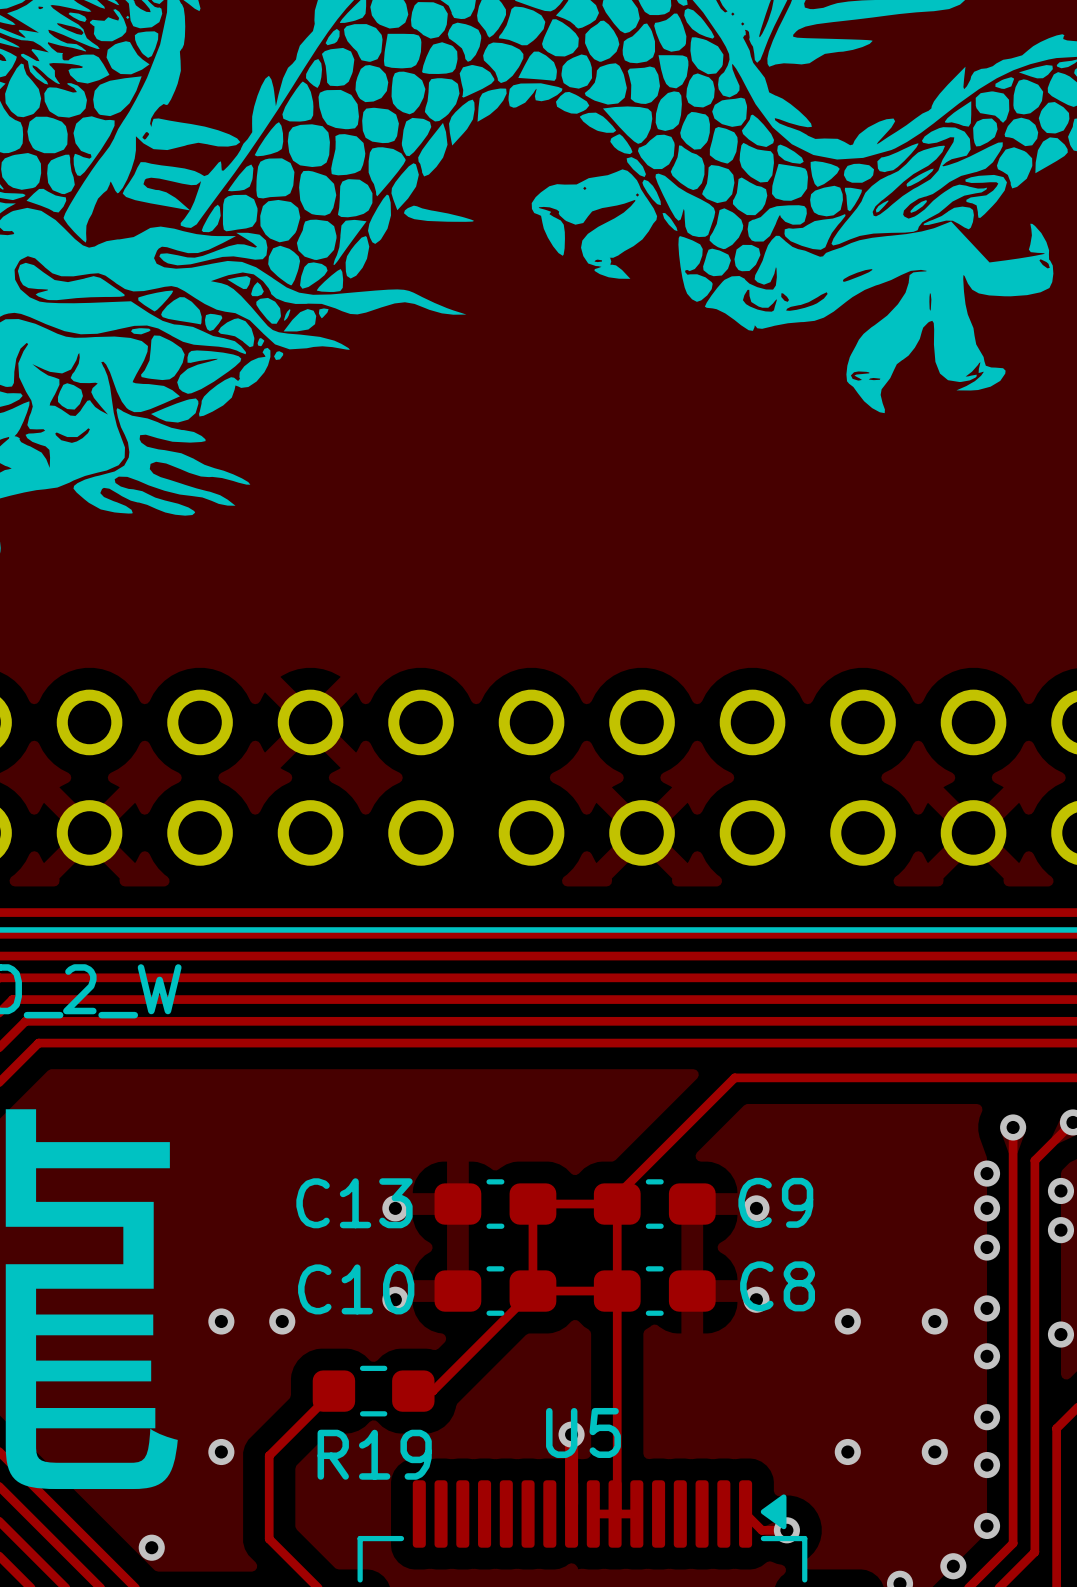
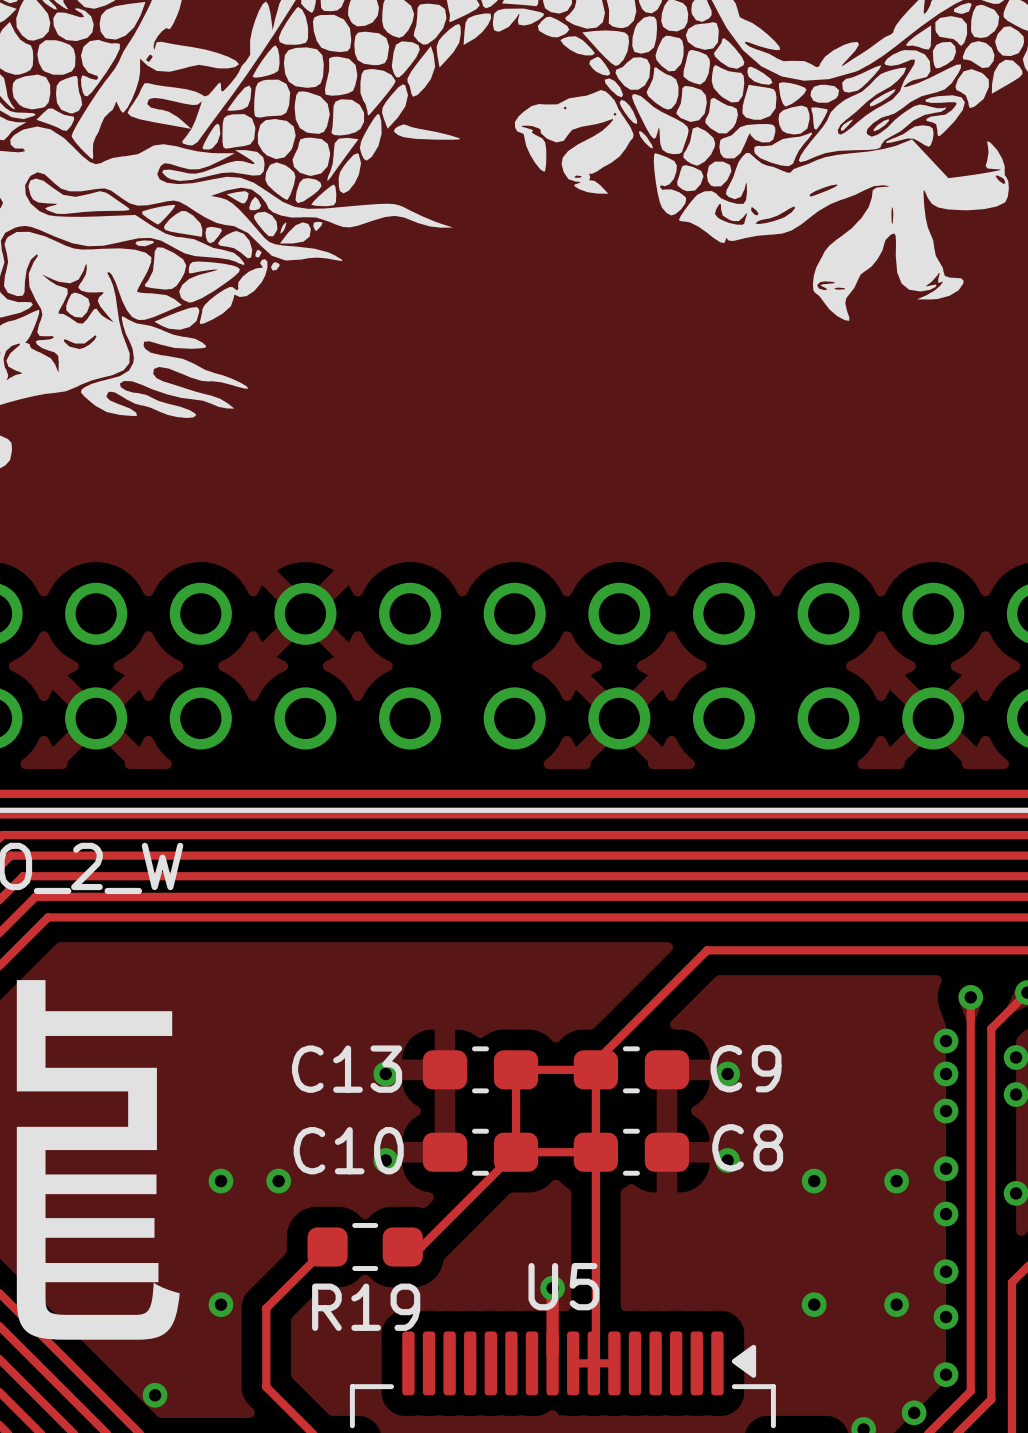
track: (745, 1513) (761, 1530) (786, 1530) -> none
via: (786, 1530) -> none

